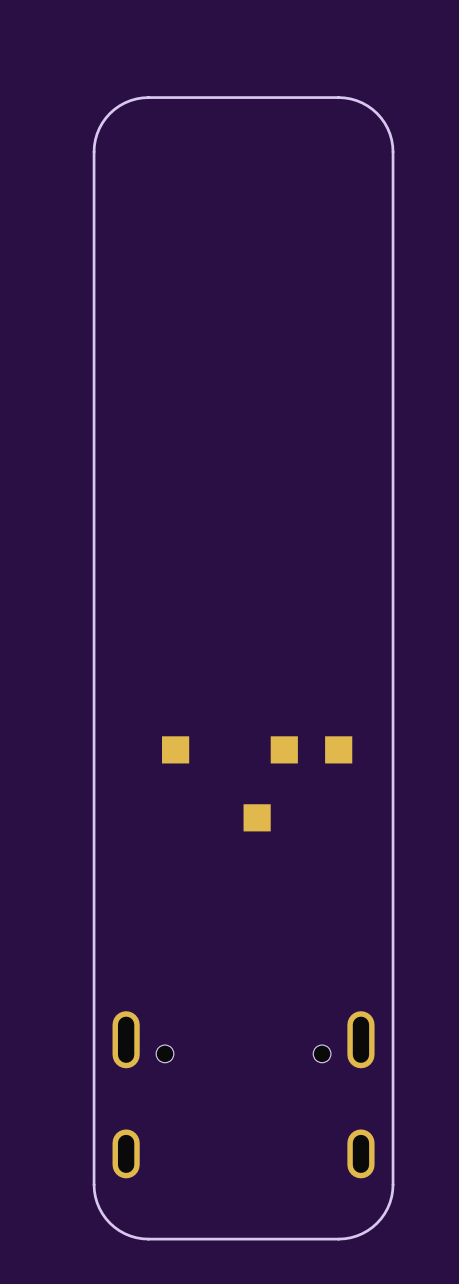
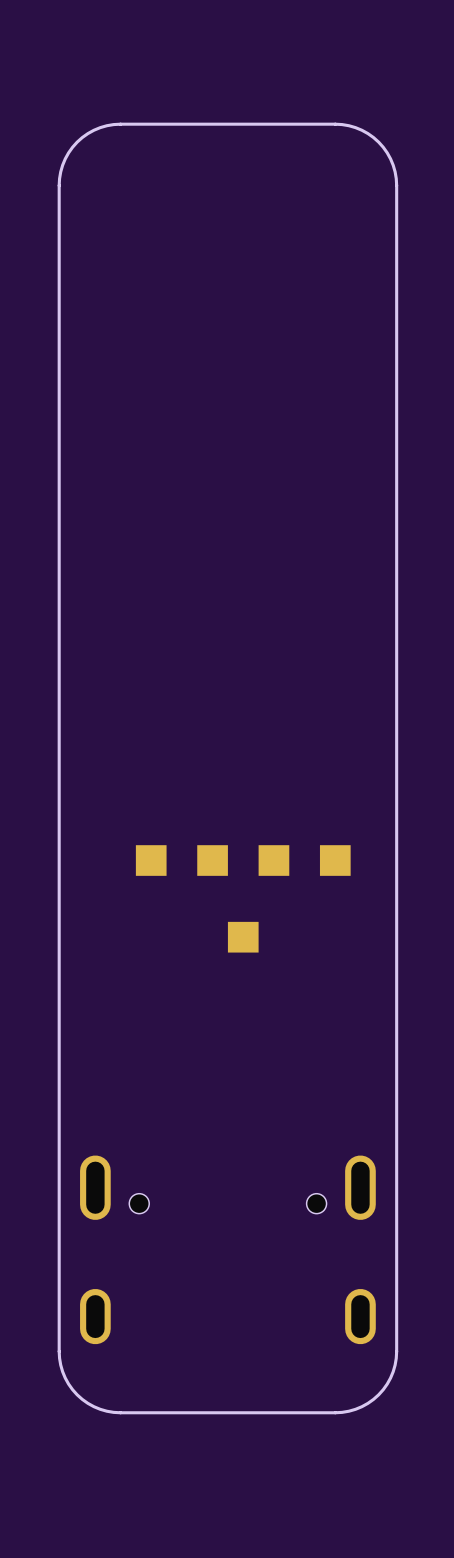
part: none -> (212, 860)

